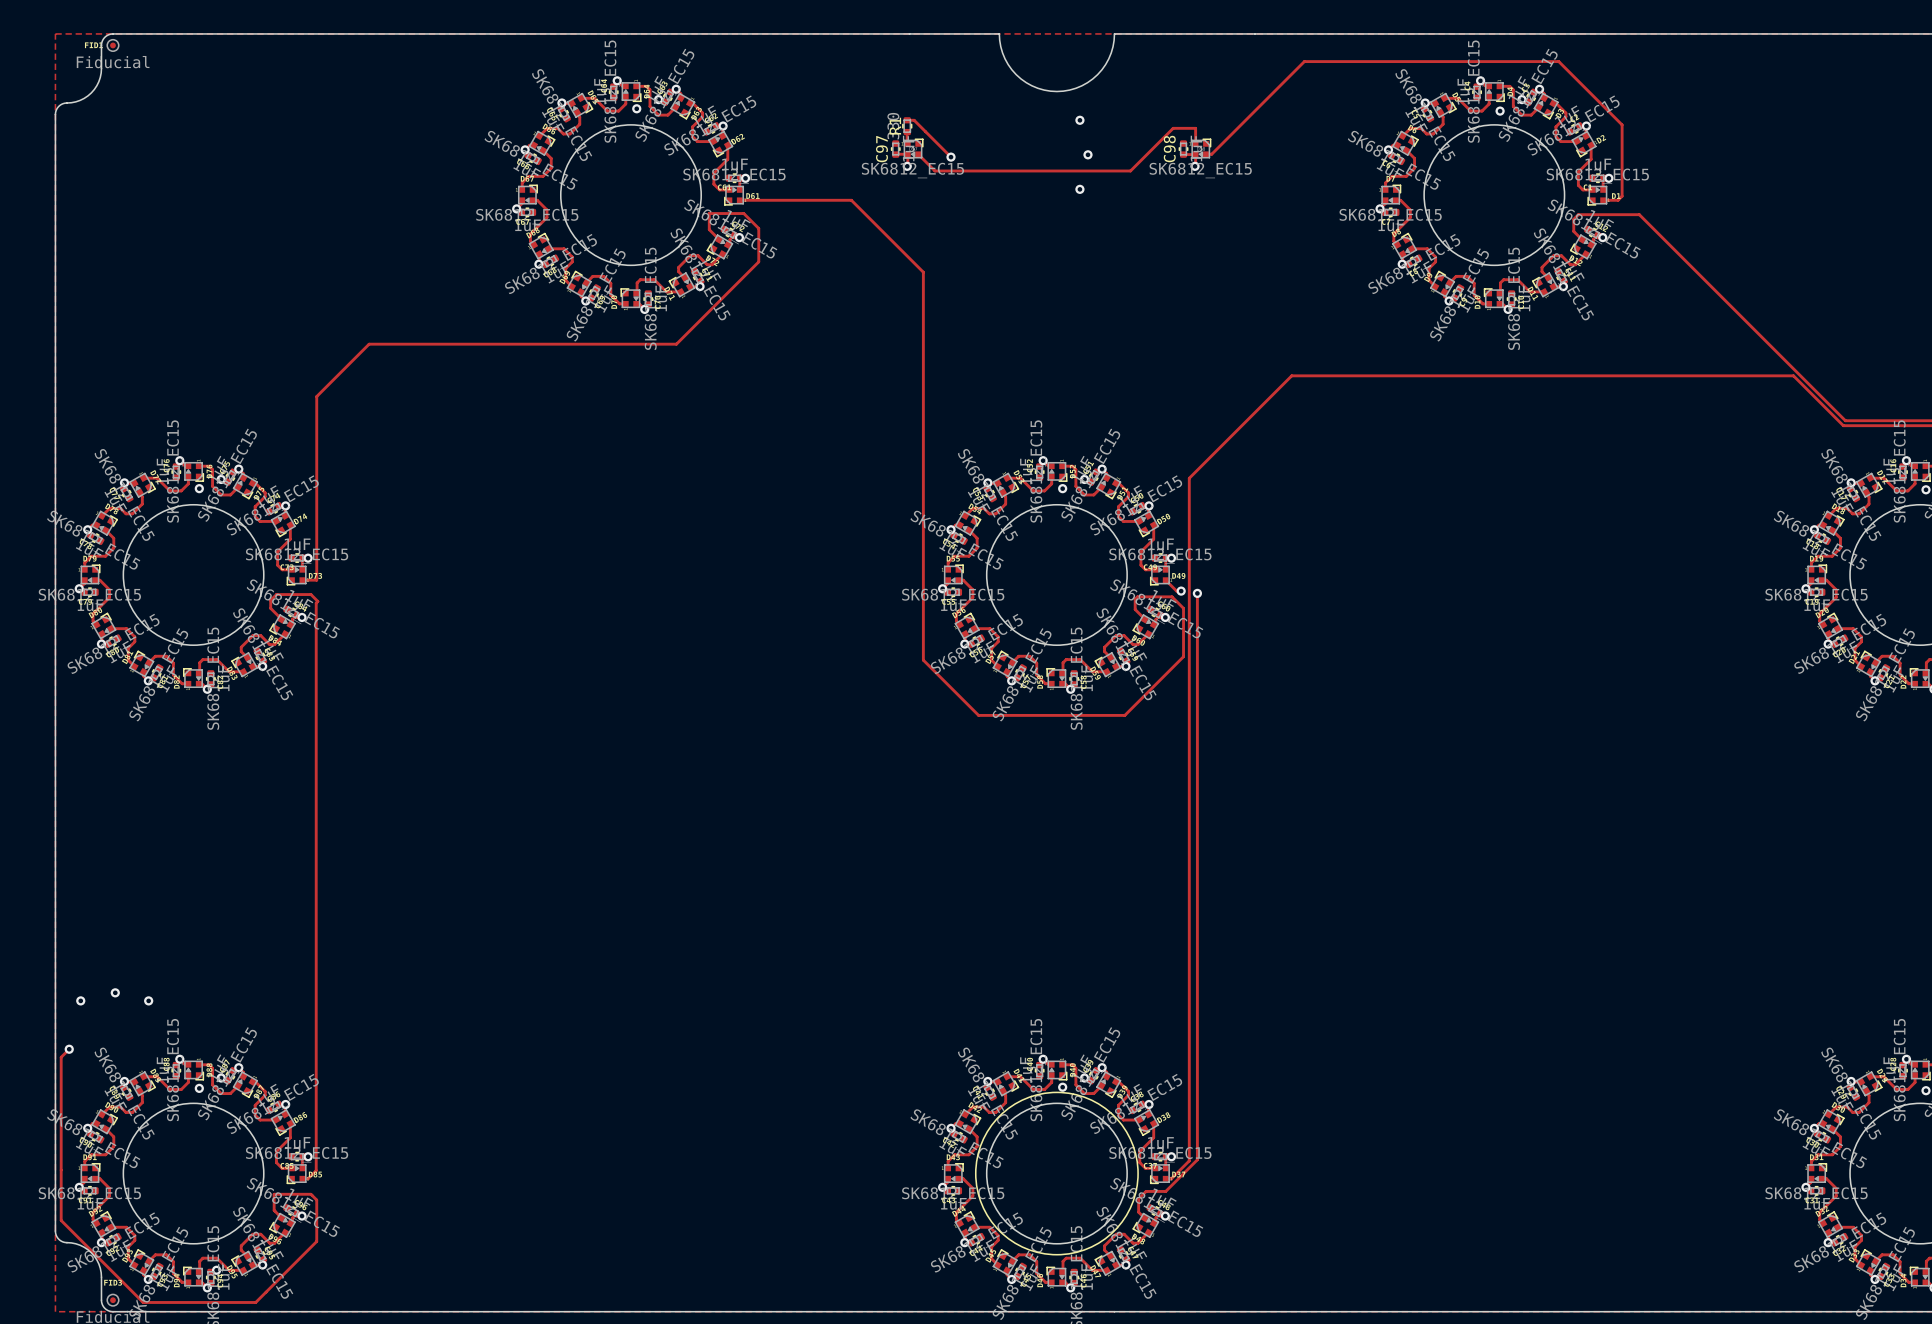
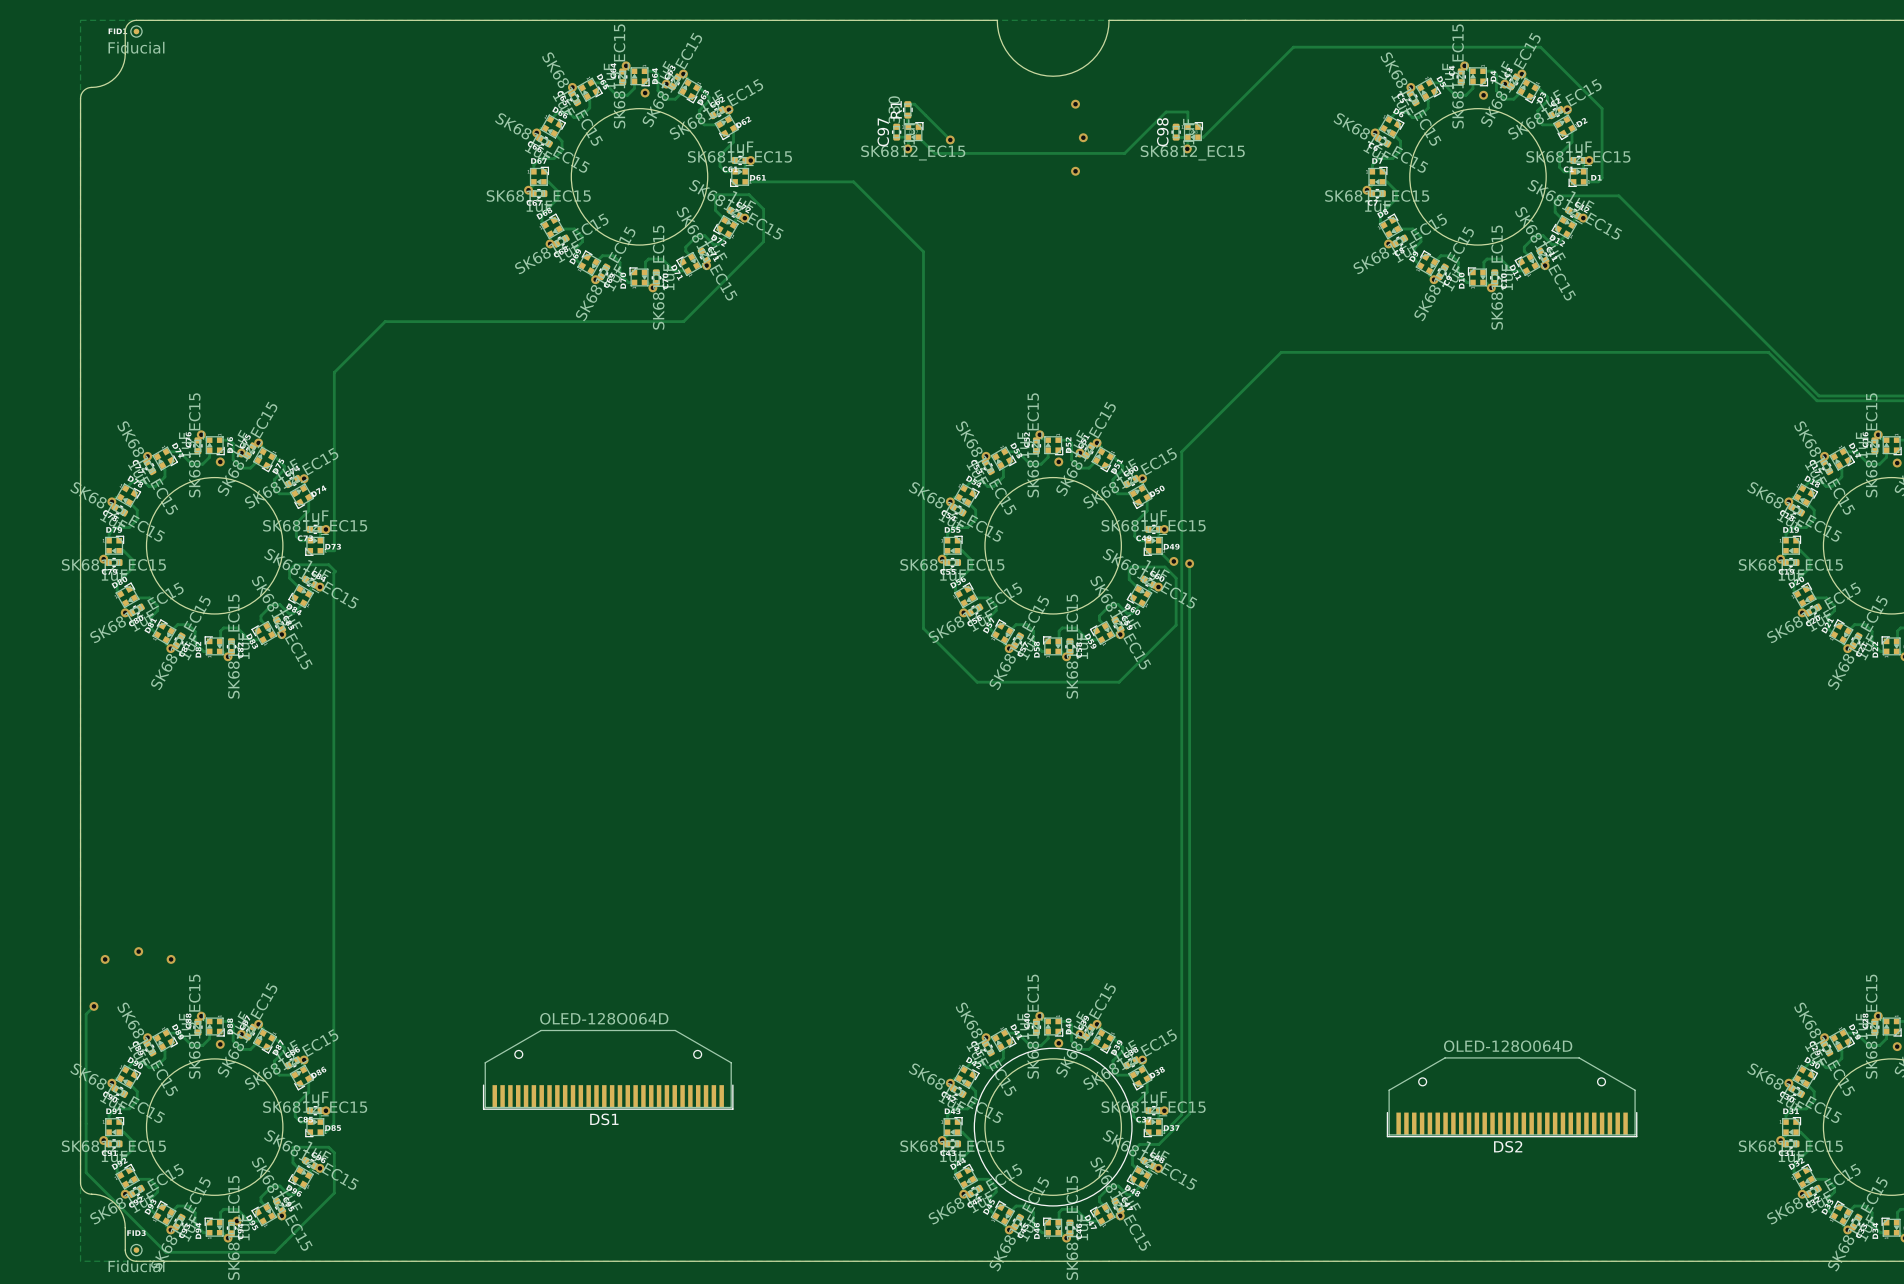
DS1: none -> OLED-128O064D (608, 1069)
DS2: none -> OLED-128O064D (1512, 1097)

